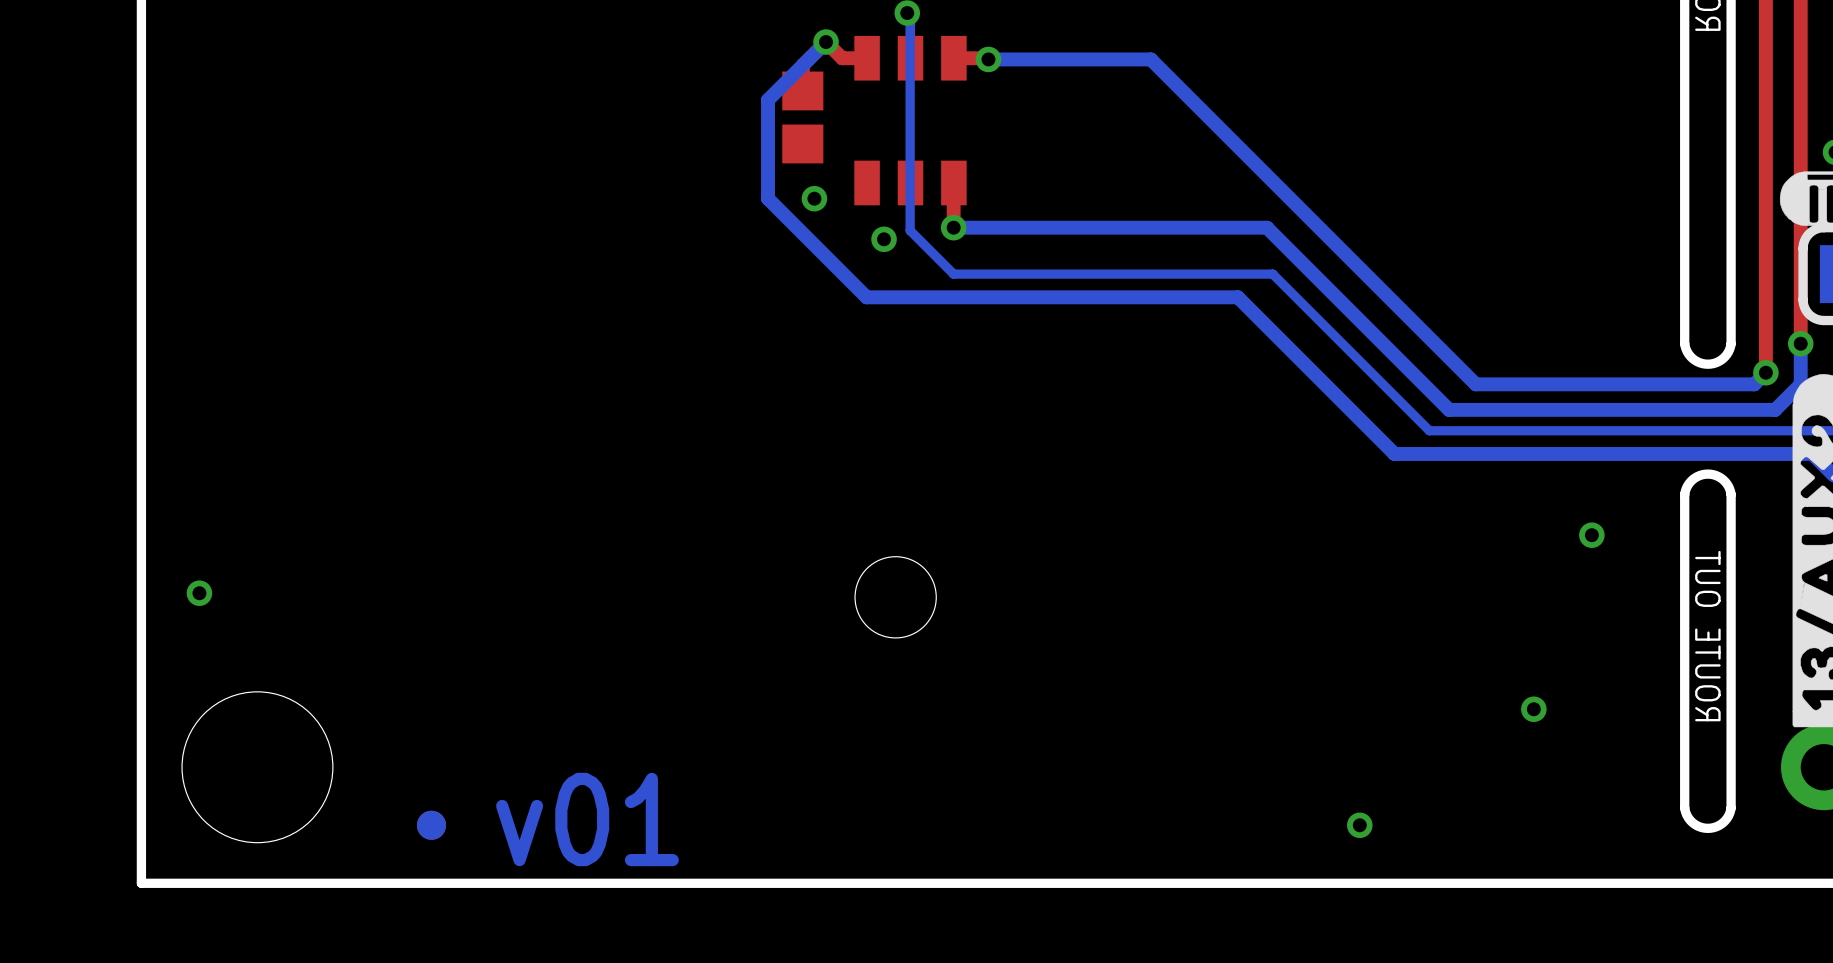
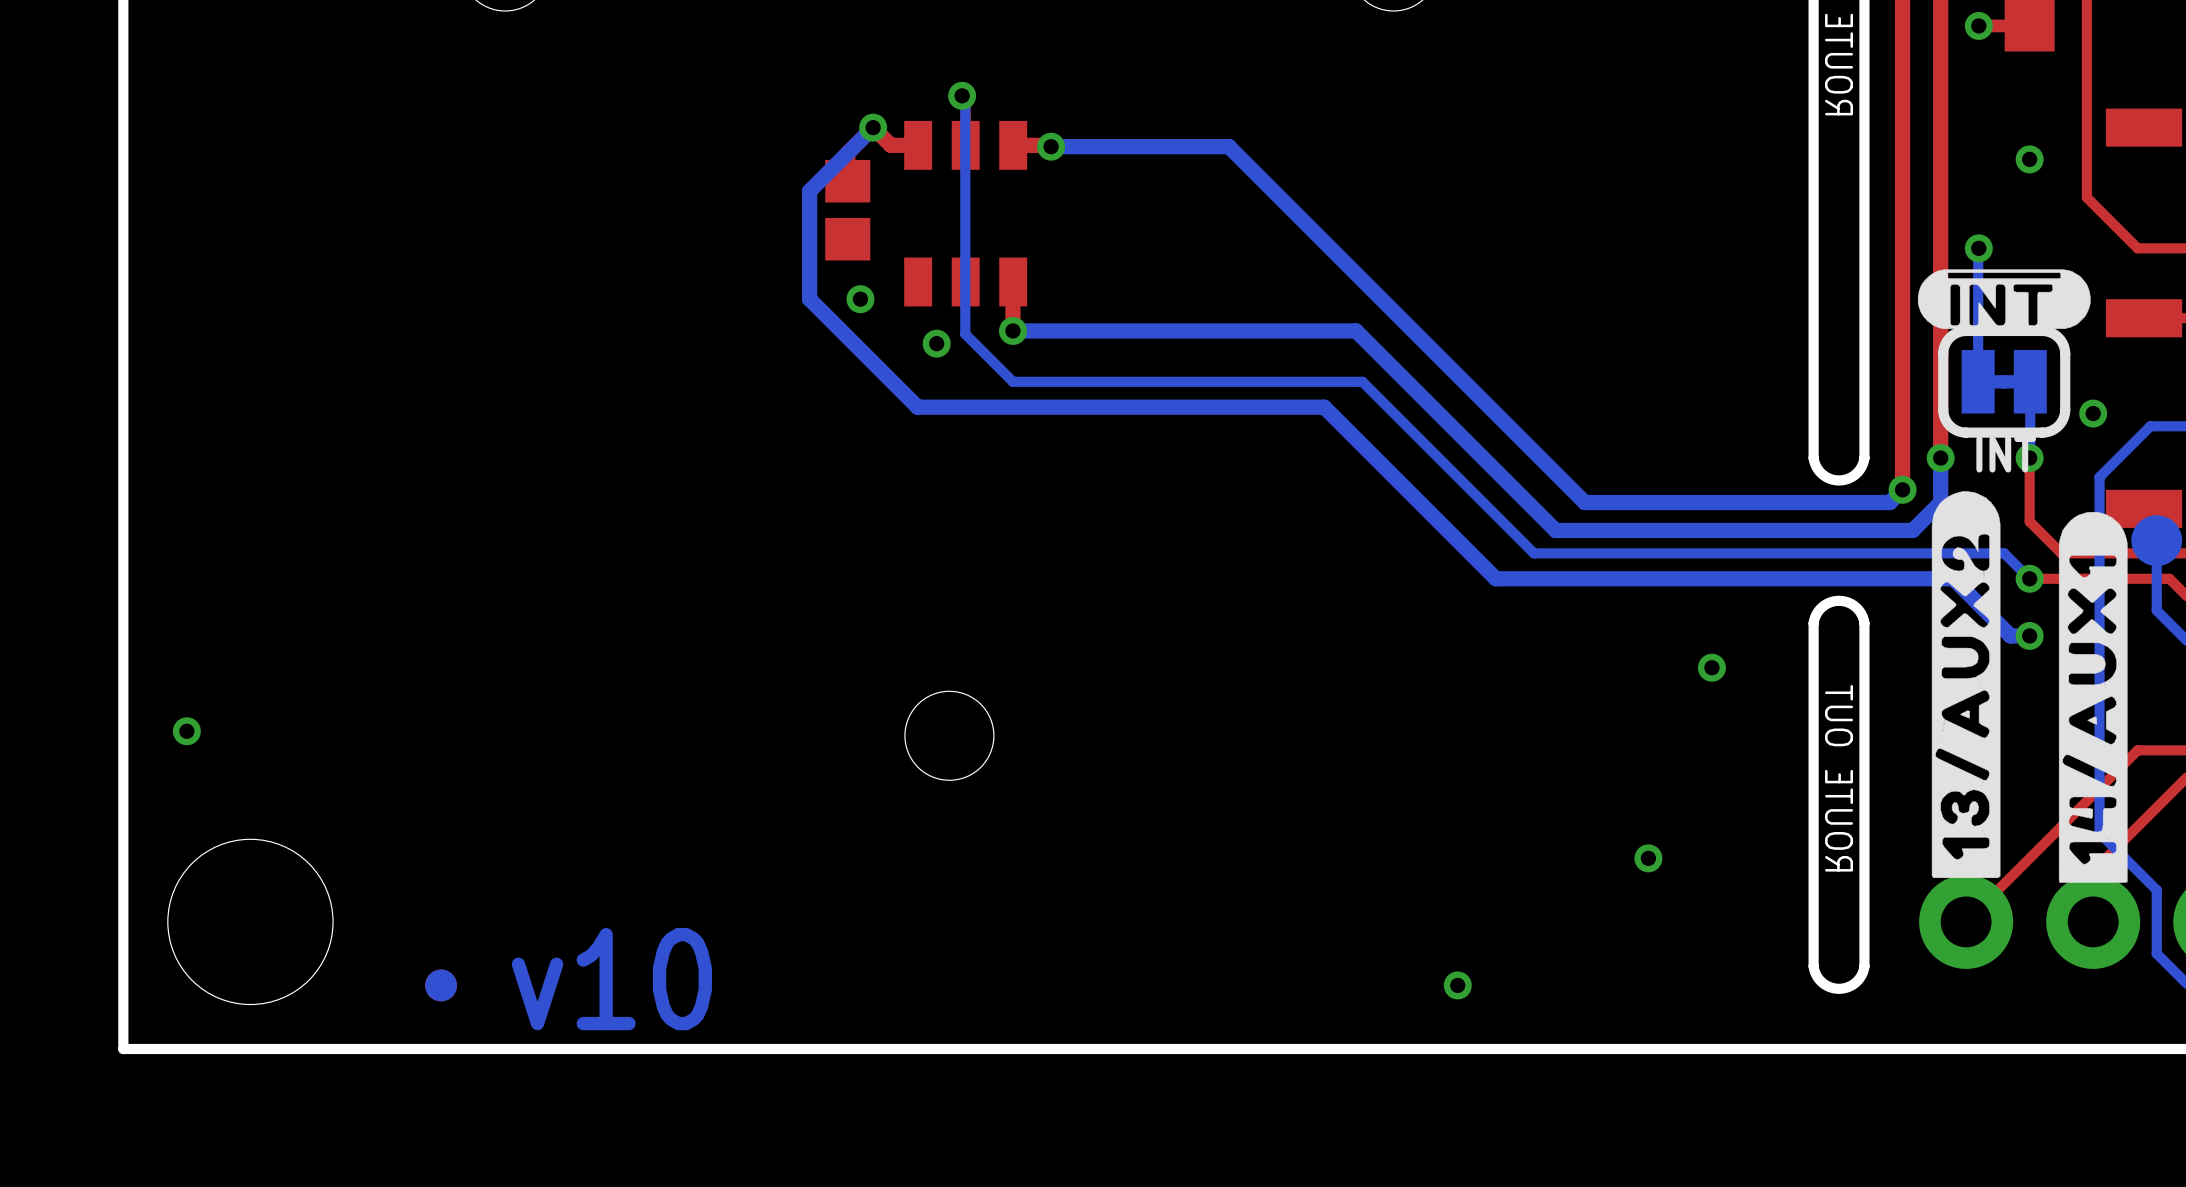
text: v01 (587, 819) -> v10 (611, 979)

